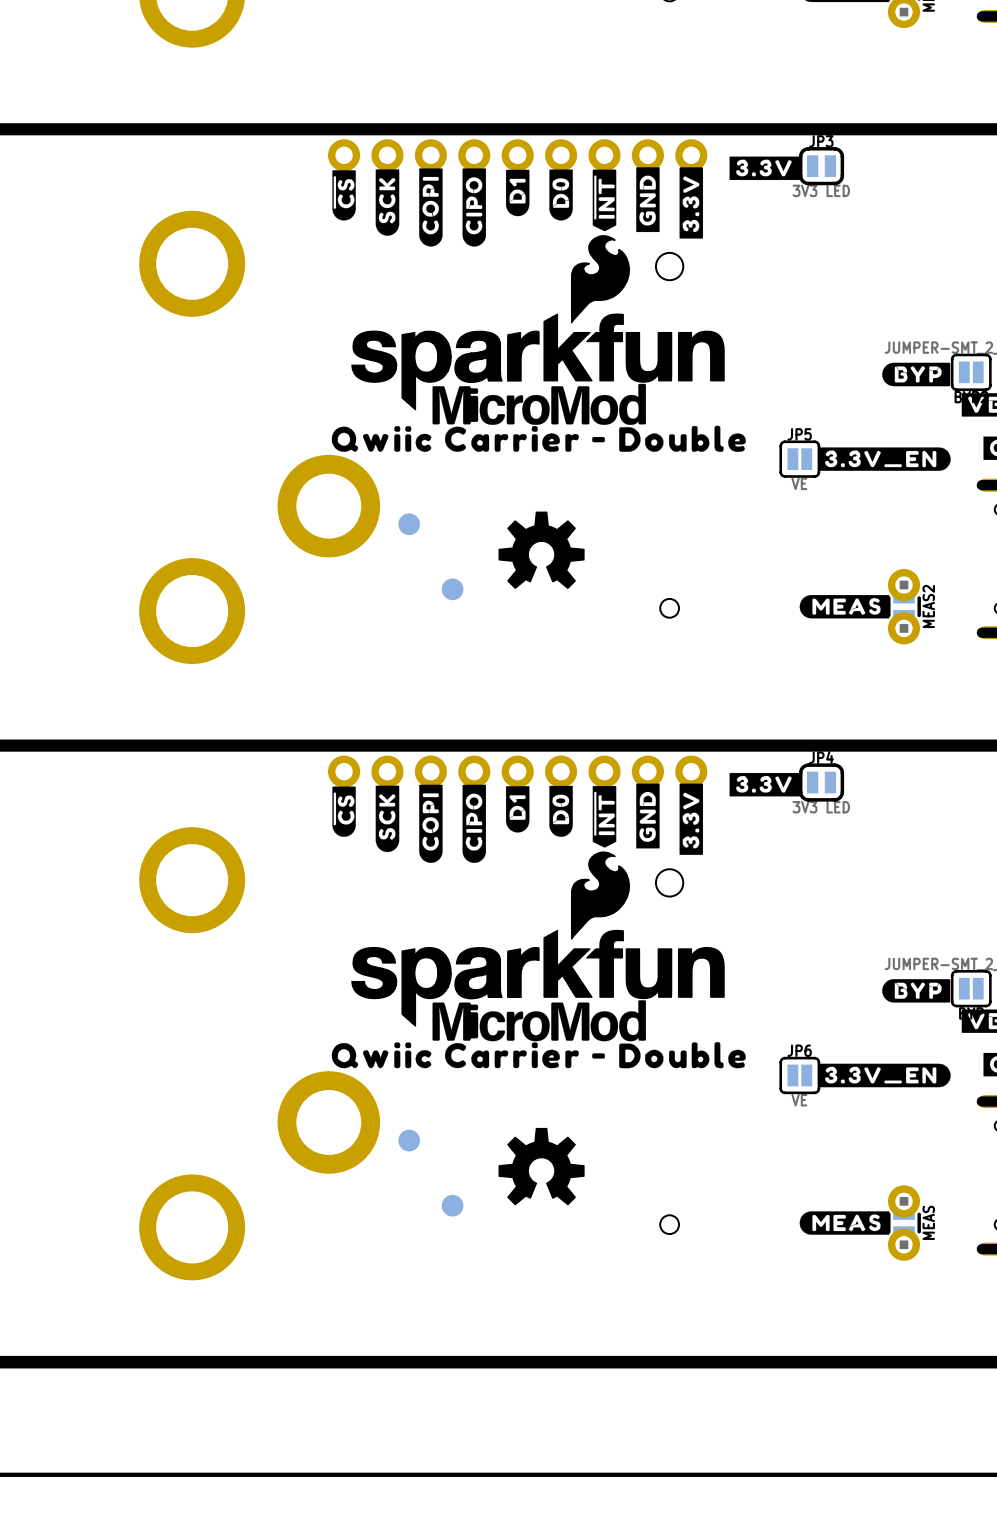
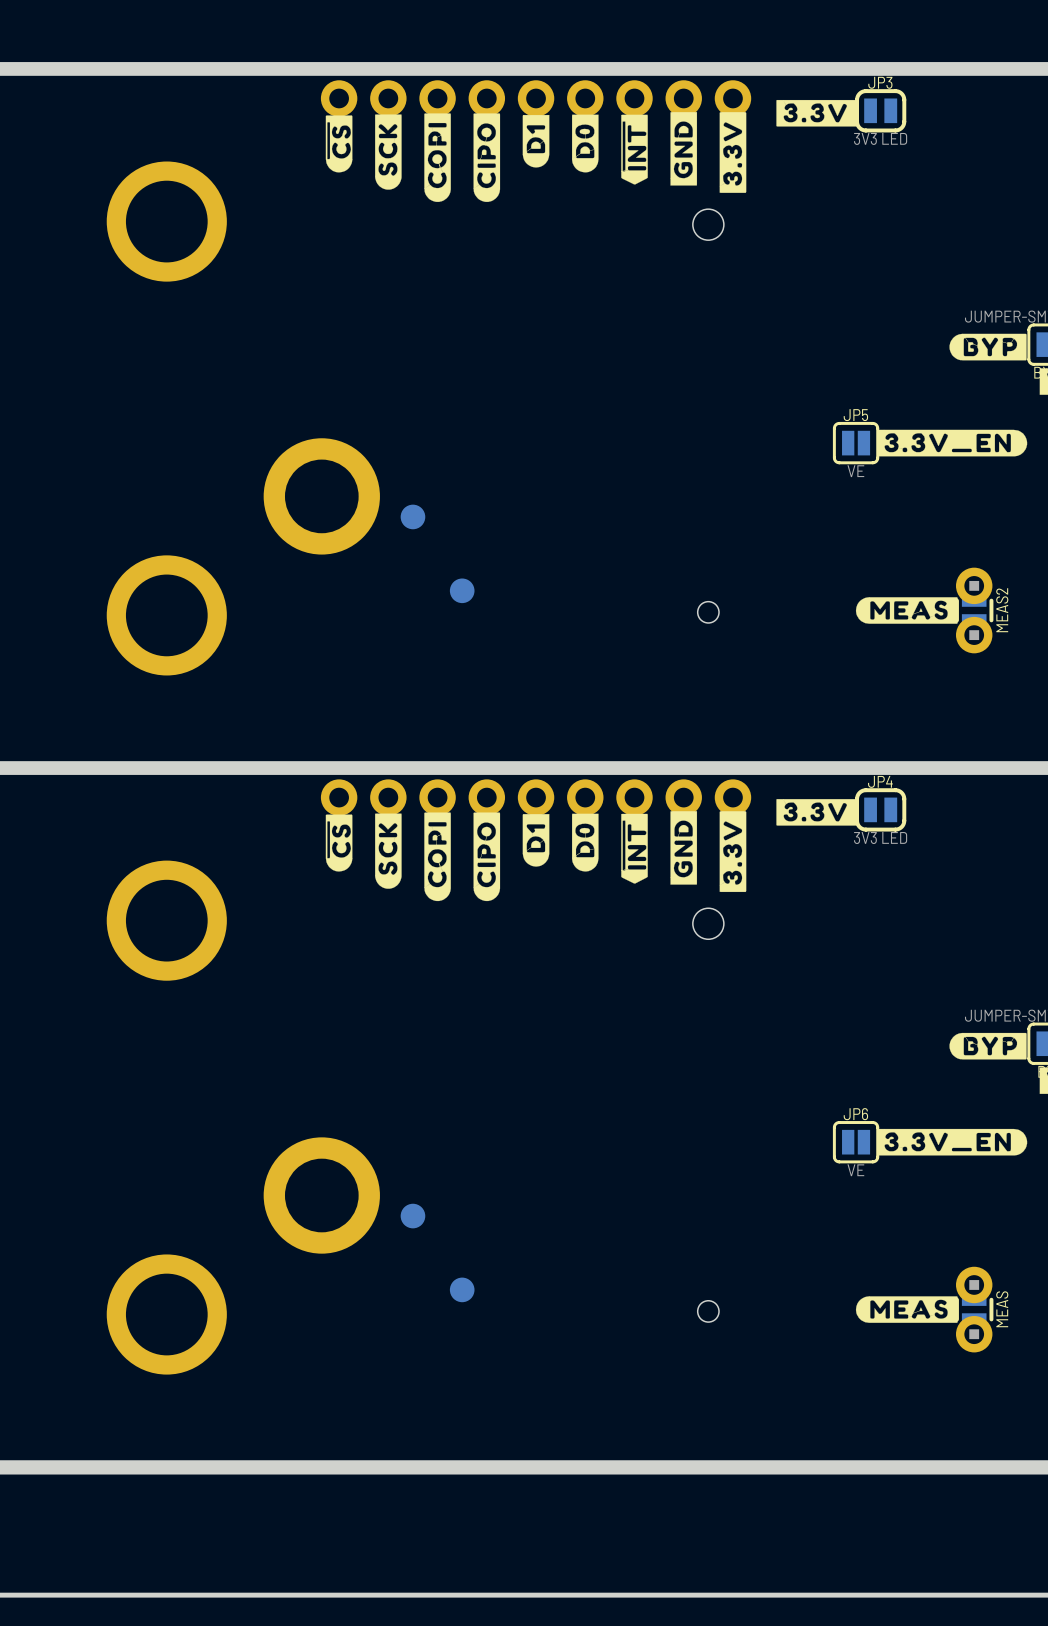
drawing: [331, 235, 746, 452] -> none
drawing: [498, 511, 585, 589] -> none
drawing: [331, 851, 746, 1069] -> none
drawing: [498, 1127, 585, 1206] -> none

